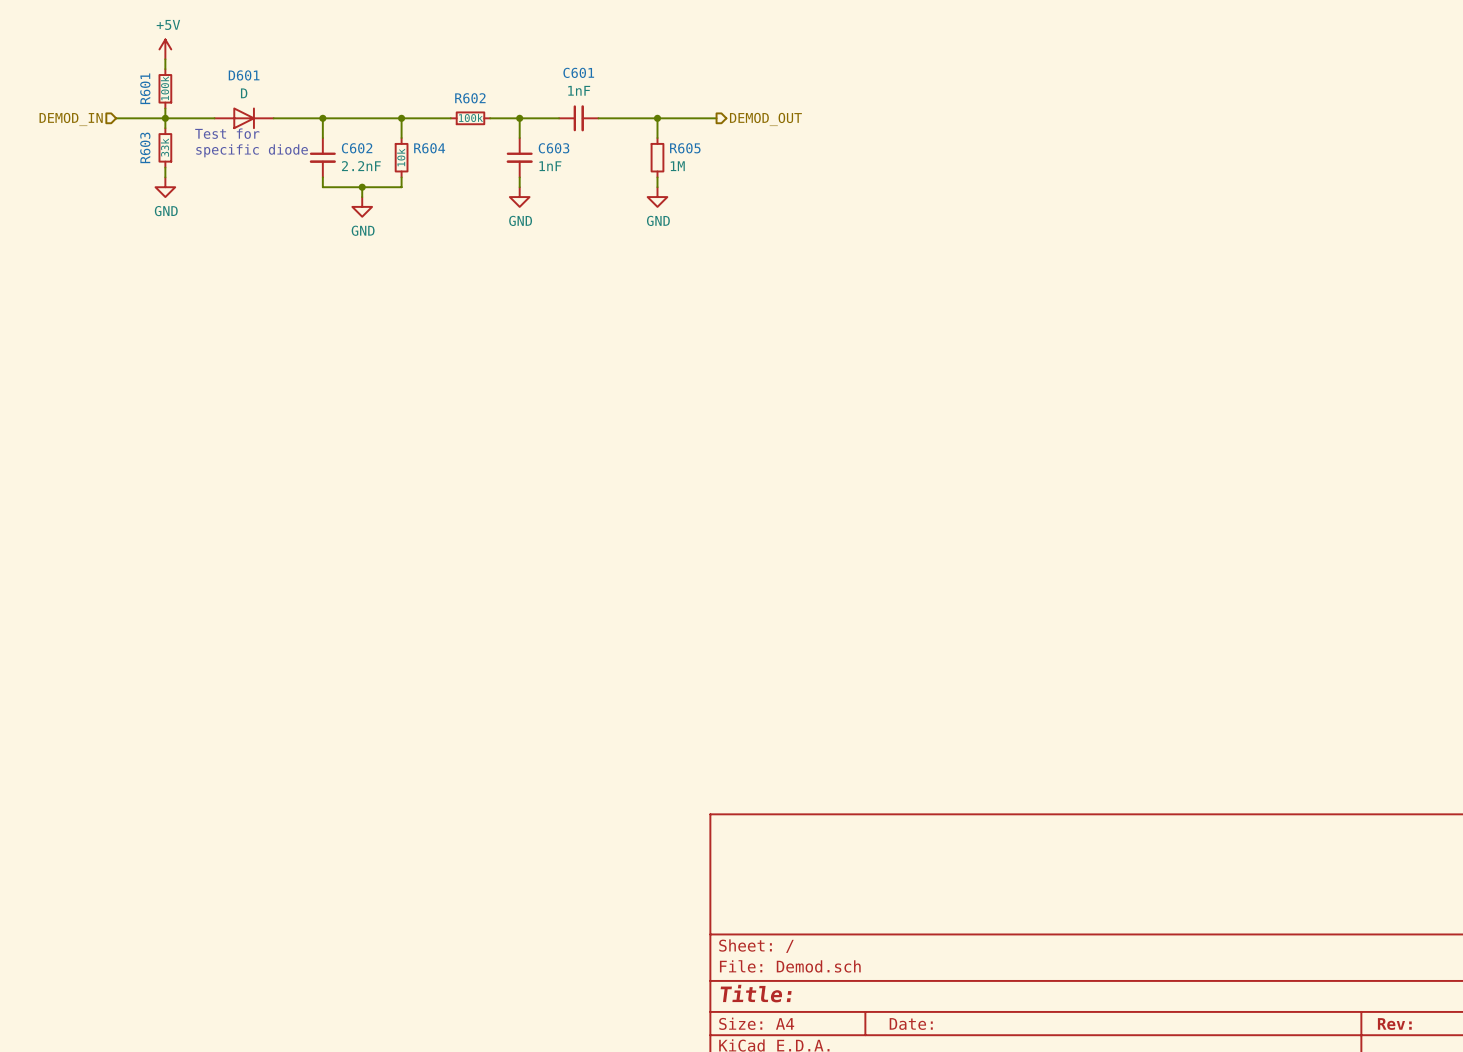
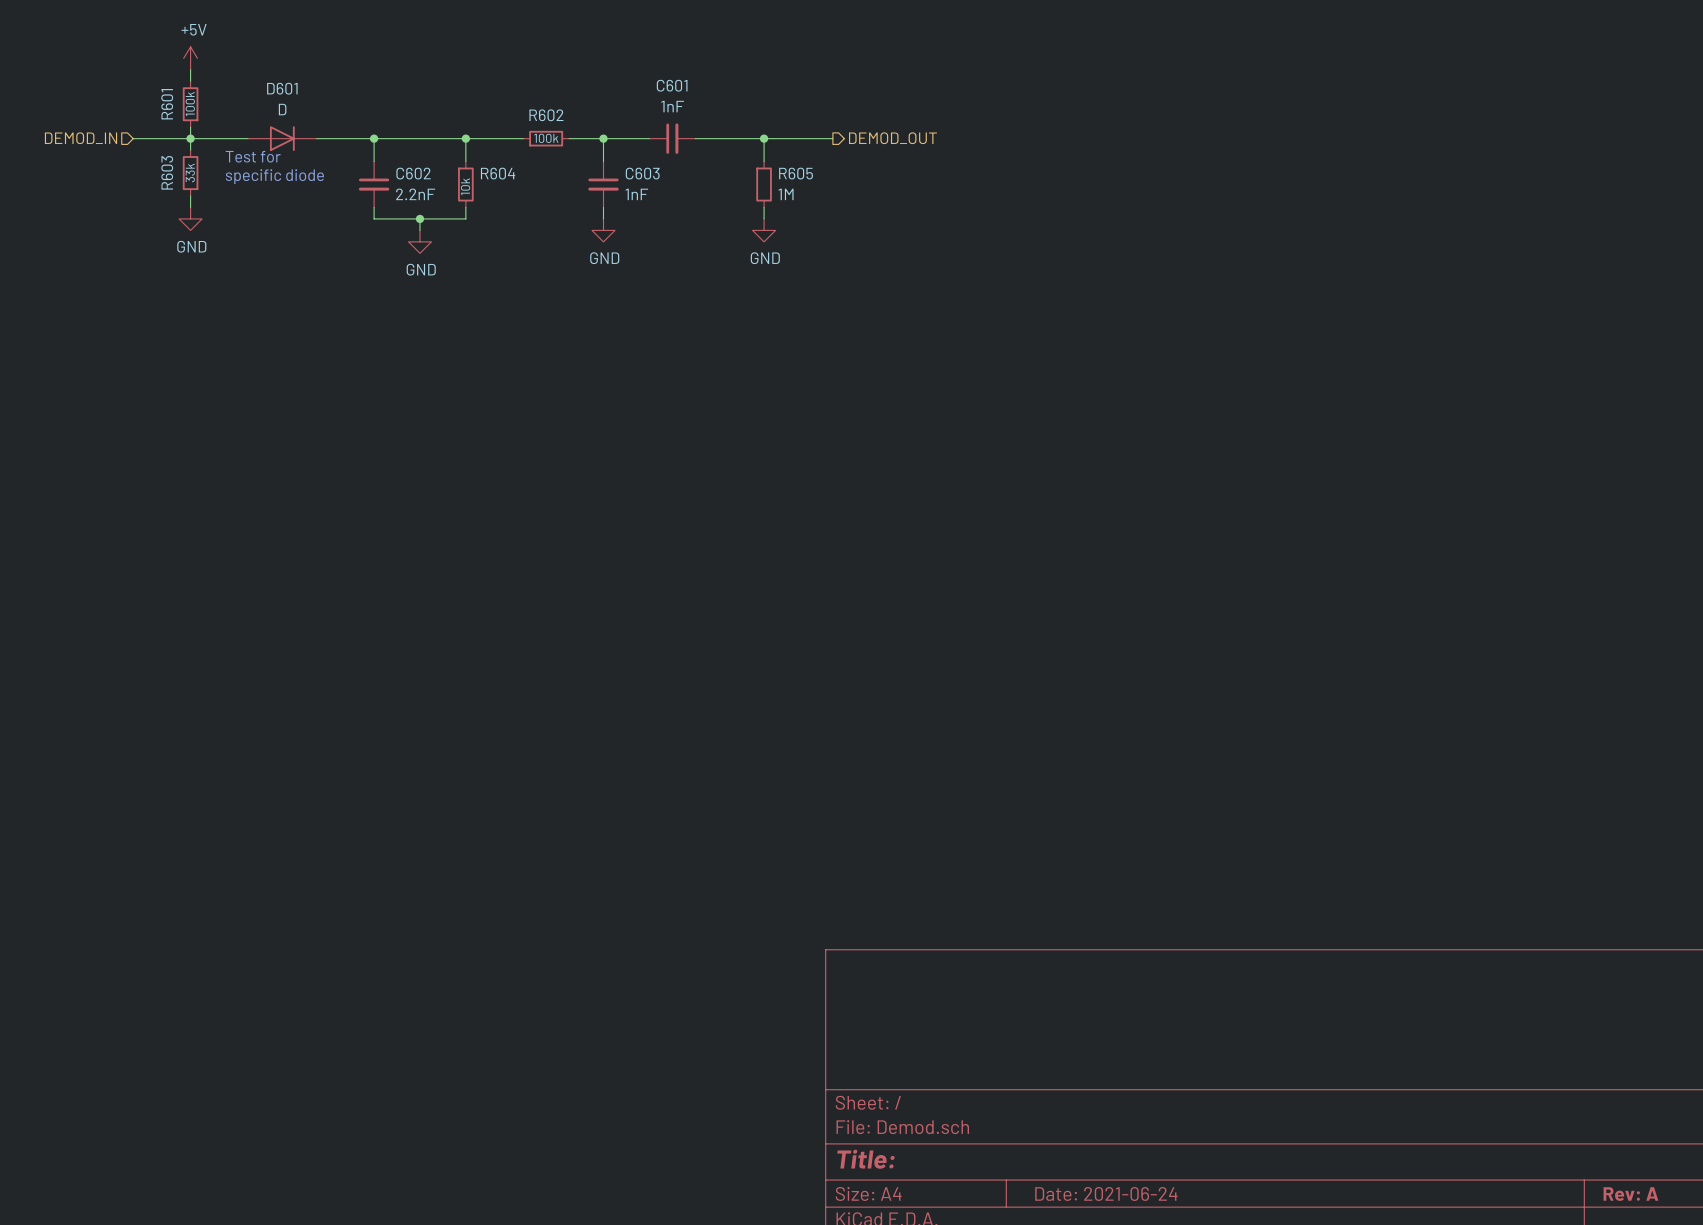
title block: Date: (911, 1024) -> Date: 2021-06-24 (1106, 1193)
title block: Rev: (1394, 1024) -> Rev: A (1630, 1194)

